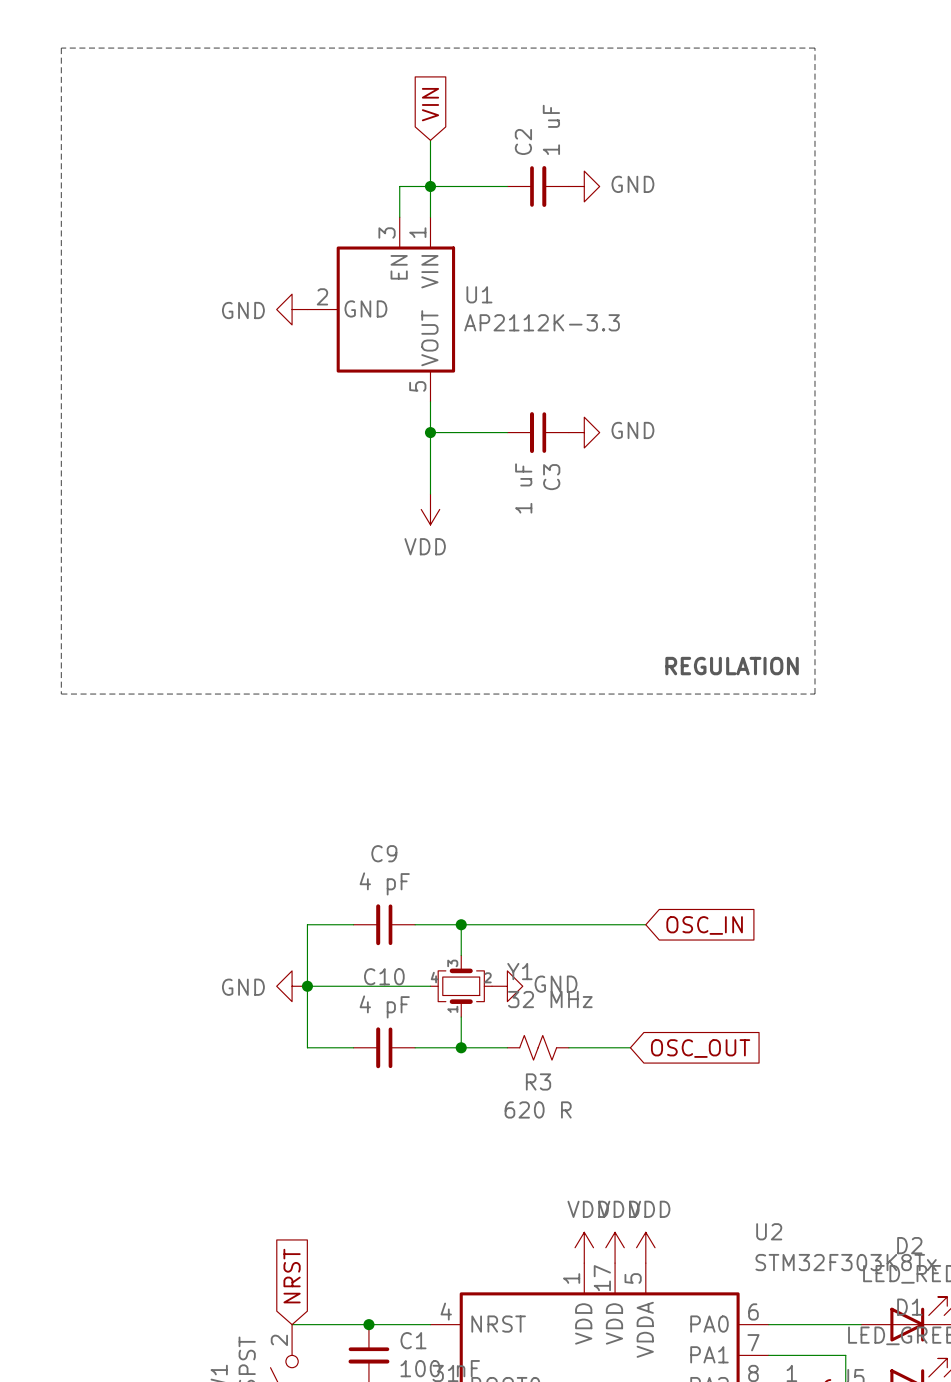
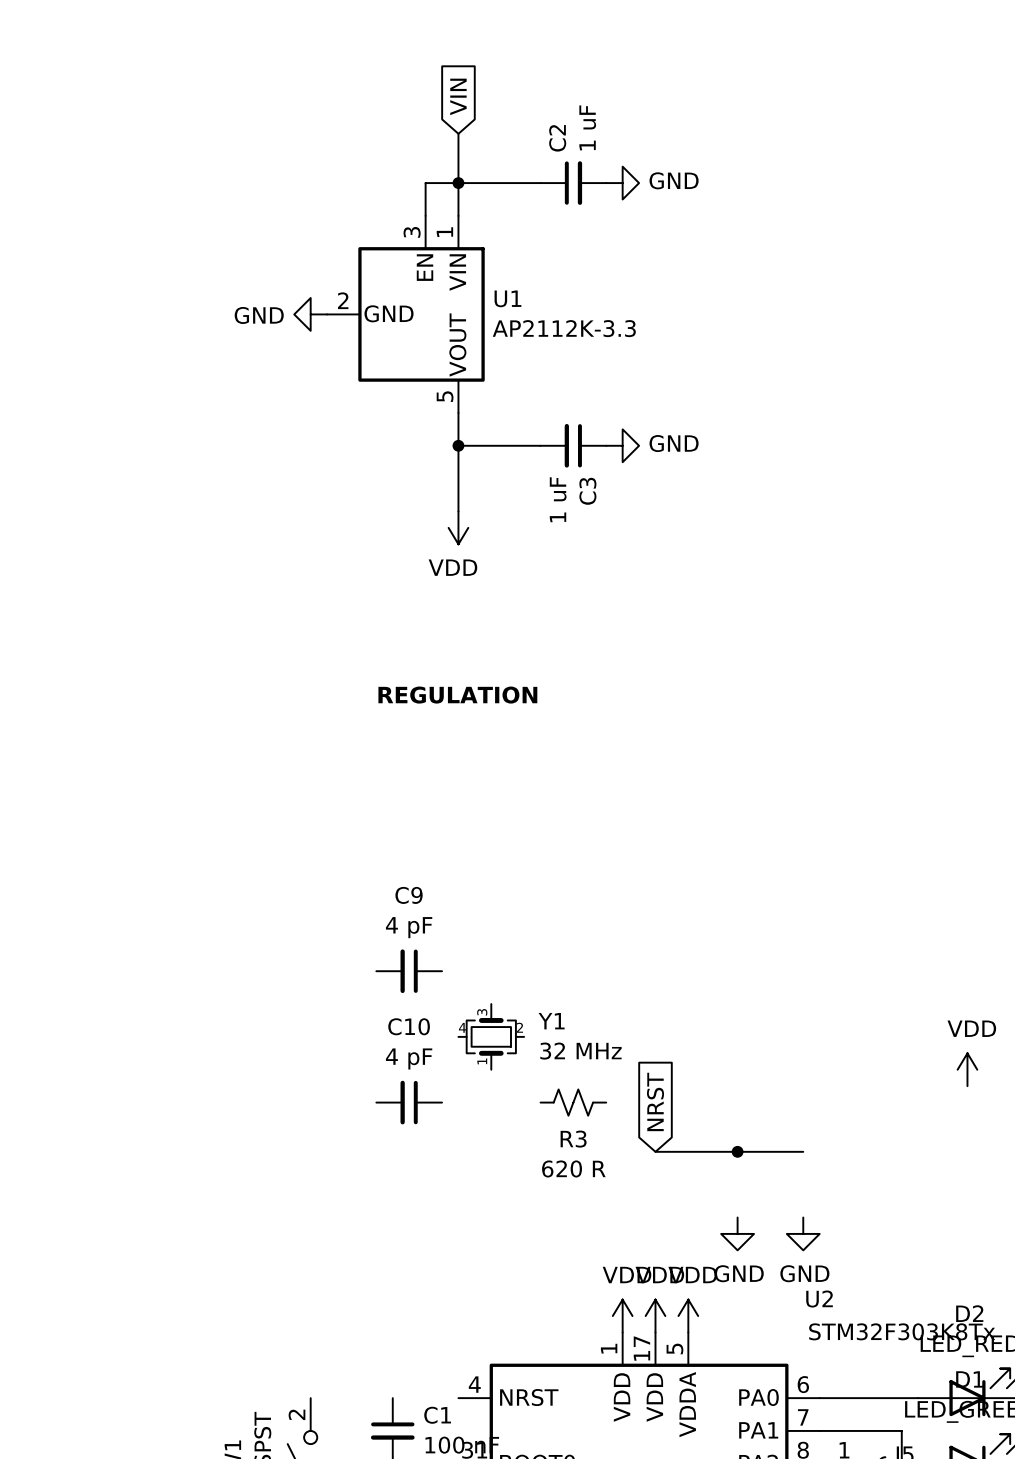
line: (61, 48) (61, 694) (814, 694) (814, 48) (61, 48) -> none
text: none -> REGULATION (457, 695)
text: REGULATION (732, 666) -> none
wire: (353, 924) (307, 924) (307, 1047) (353, 1047) -> none
wire: (415, 924) (645, 924) -> none
wire: (461, 924) (461, 955) -> none
junction: (461, 924) -> none
global label: OSC_IN (704, 925) -> none
power symbol: GND (292, 986) -> none
wire: (307, 986) (430, 986) -> none
junction: (307, 986) -> none
power symbol: GND (507, 986) -> none
wire: (461, 1017) (461, 1047) -> none
power symbol: none -> VDD (967, 1069)
global label: none -> NRST (655, 1101)
wire: (415, 1047) (507, 1047) -> none
junction: (461, 1047) -> none
wire: (568, 1047) (630, 1047) -> none
global label: OSC_OUT (700, 1048) -> none
wire: none -> (655, 1151) (803, 1151)
junction: none -> (737, 1151)
power symbol: none -> GND (737, 1233)
power symbol: none -> GND (803, 1233)
global label: NRST (292, 1276) -> none
wire: (292, 1324) (430, 1324) -> none
junction: (368, 1324) -> none

